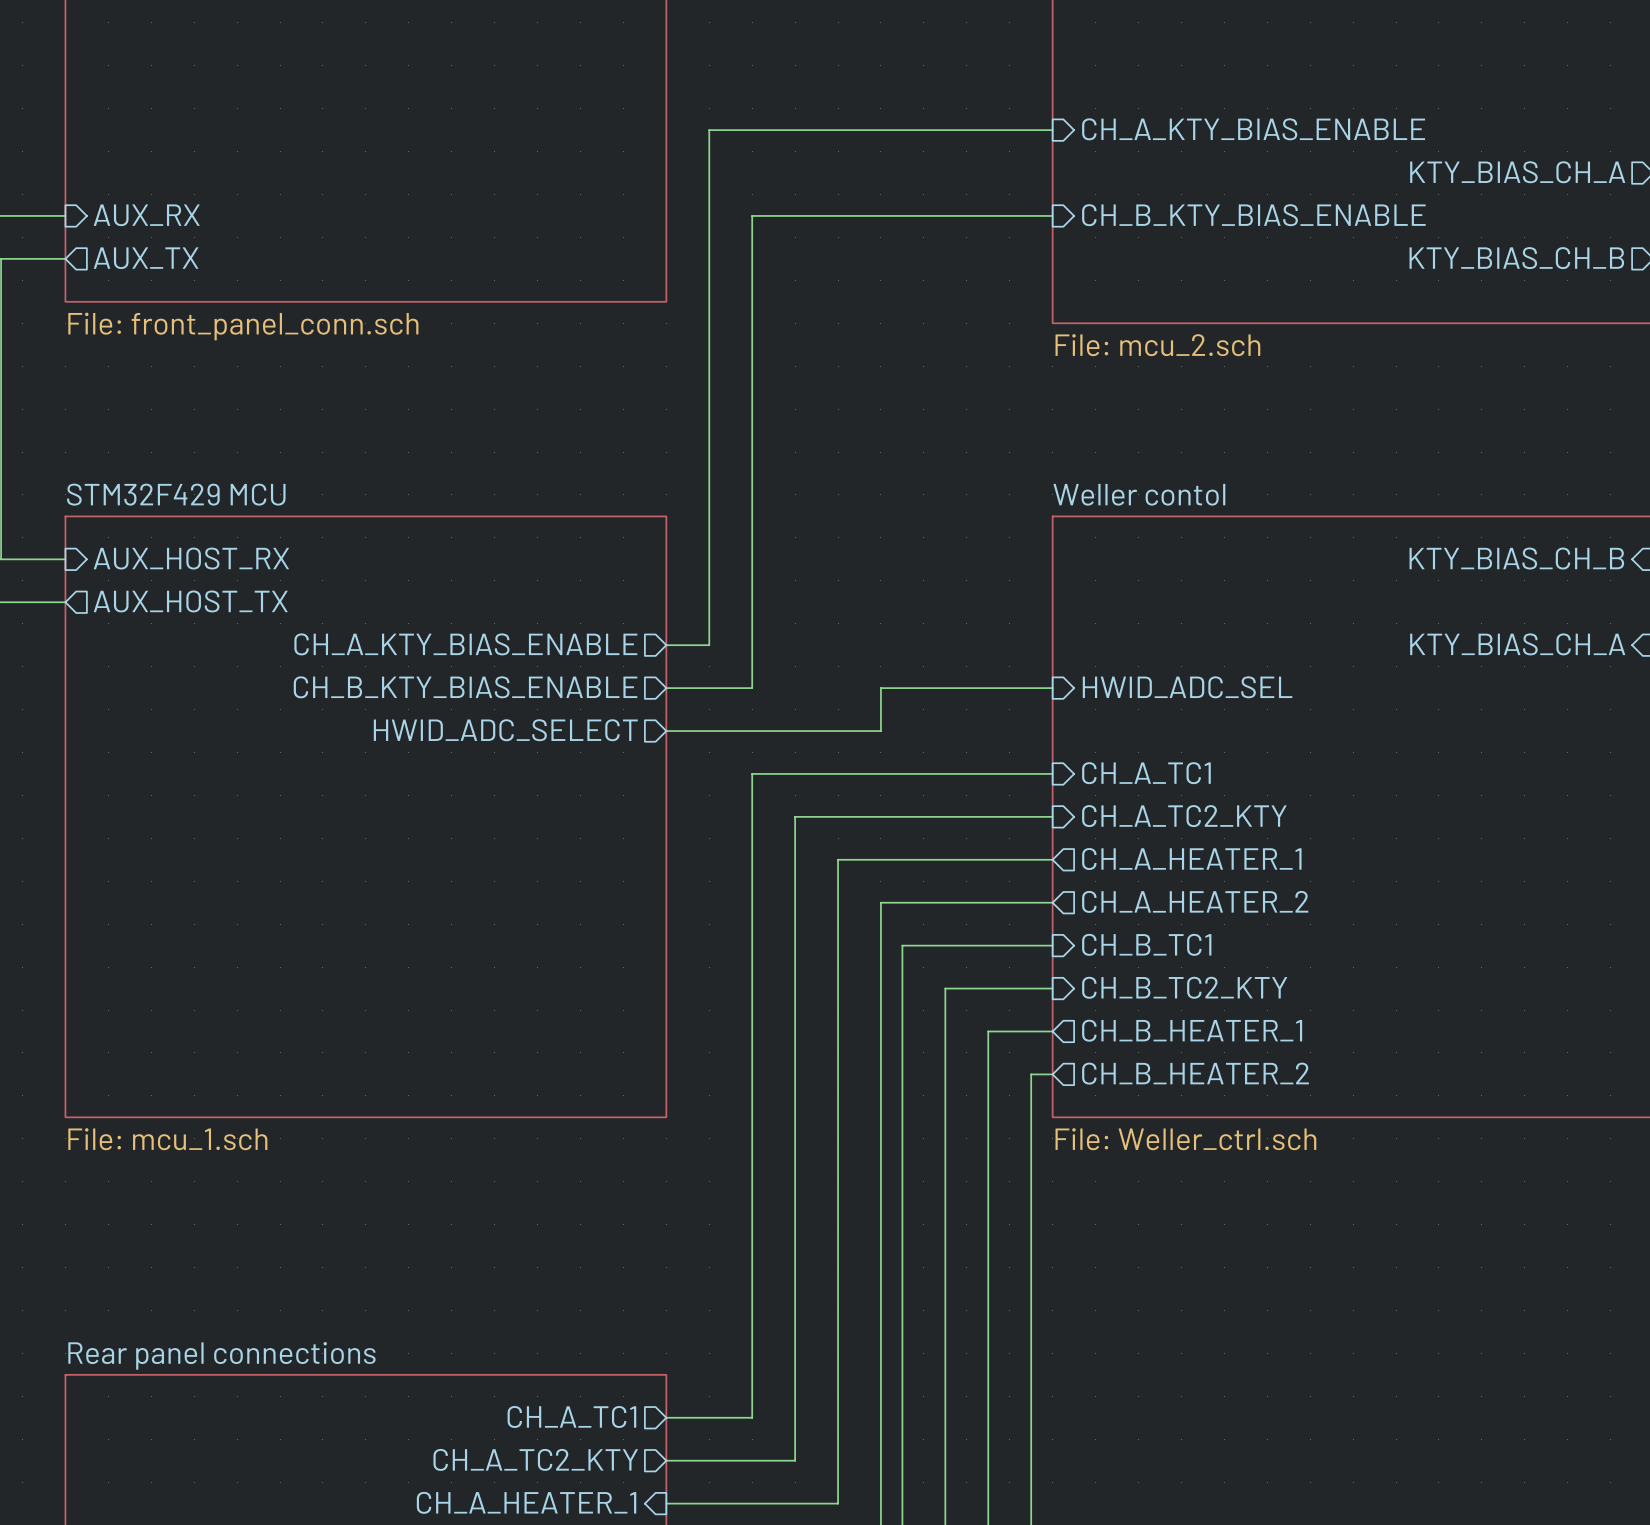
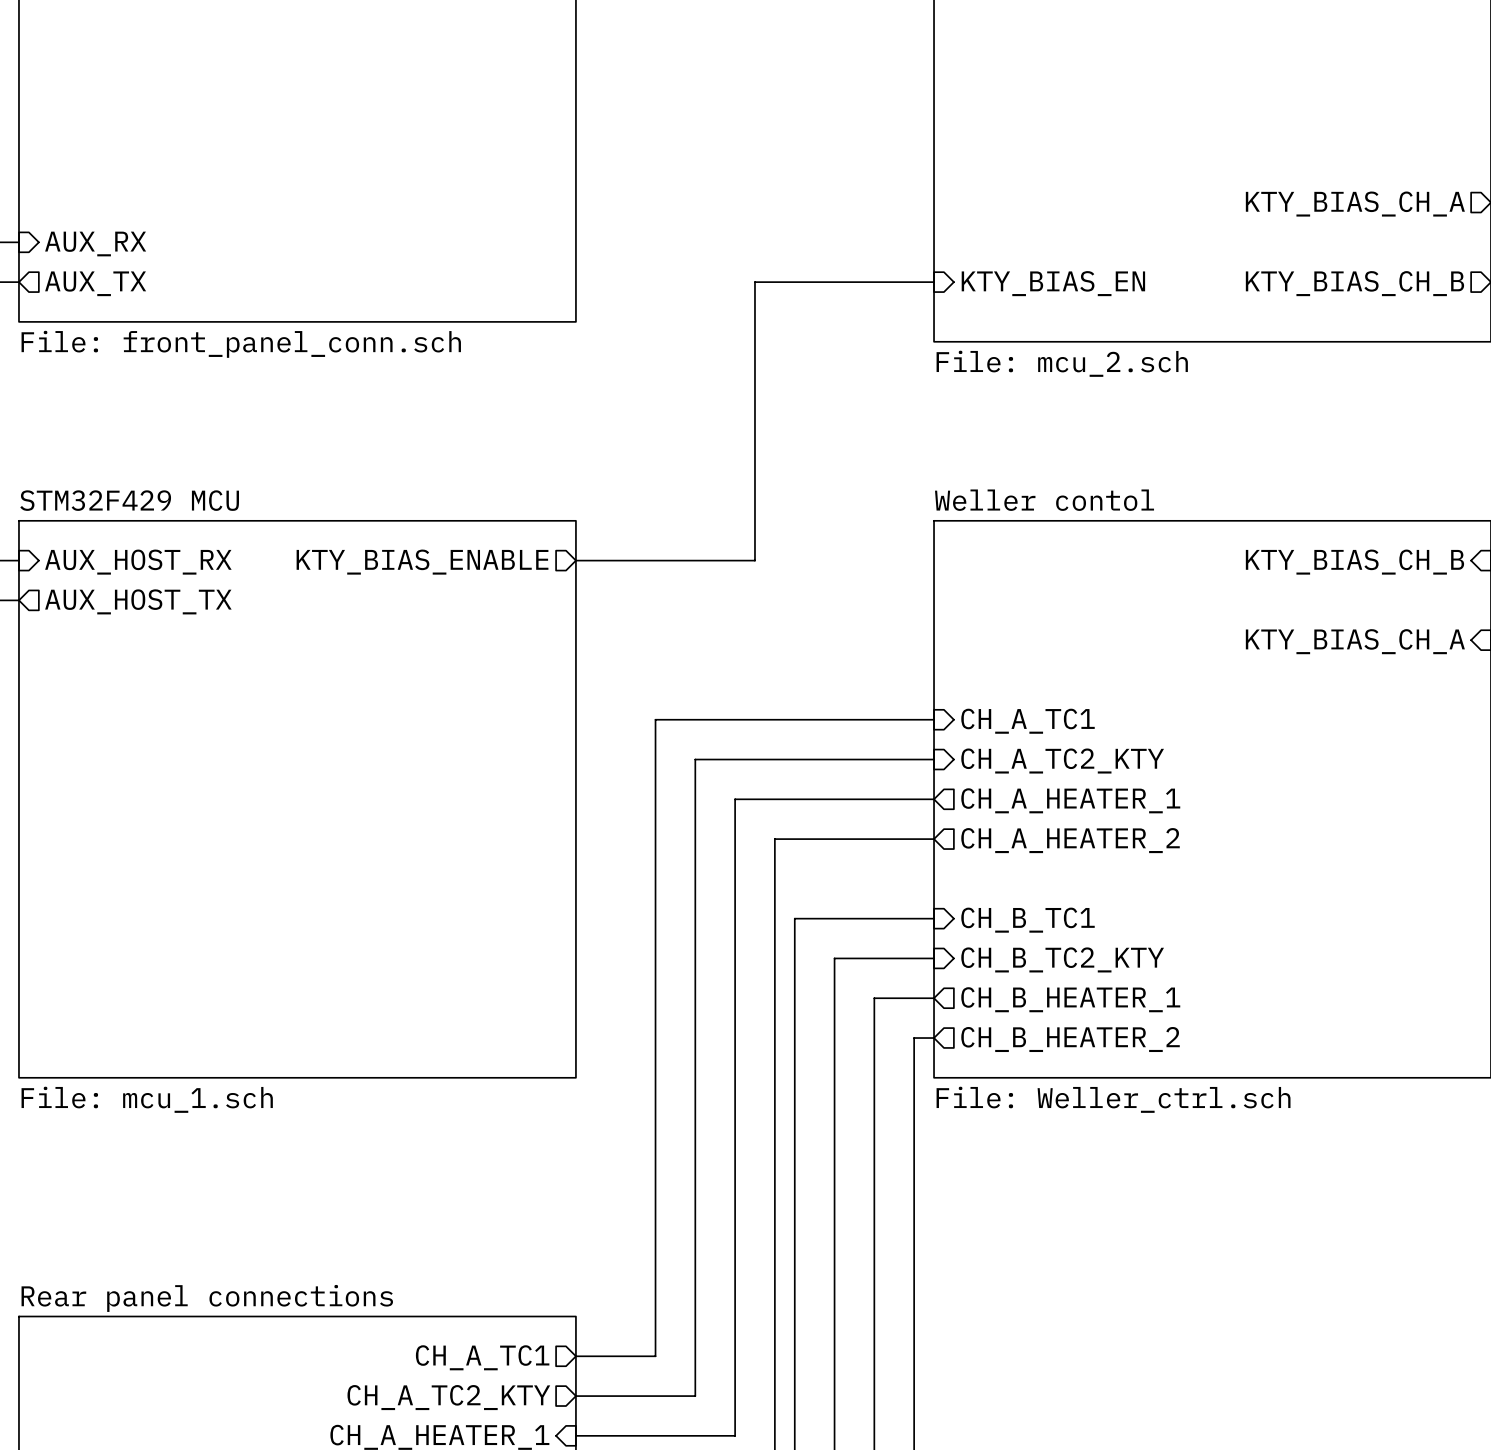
sheet pin: CH_A_KTY_BIAS_ENABLE (1253, 129) -> none
wire: (1052, 130) (709, 130) (709, 645) (666, 645) -> none
wire: (1052, 215) (752, 215) (752, 688) (666, 688) -> none
sheet pin: CH_B_KTY_BIAS_ENABLE (1253, 215) -> KTY_BIAS_EN (1053, 283)
wire: none -> (934, 282) (754, 282) (754, 560) (575, 560)
sheet pin: none -> KTY_BIAS_ENABLE (422, 562)
sheet pin: CH_A_KTY_BIAS_ENABLE (465, 644) -> none
sheet pin: CH_B_KTY_BIAS_ENABLE (465, 687) -> none
sheet pin: HWID_ADC_SEL (1187, 687) -> none
wire: (1052, 688) (880, 688) (880, 731) -> (934, 719) (774, 719)
sheet pin: HWID_ADC_SELECT (505, 730) -> none
sheet pin: none -> CH_A_TC1 (1028, 721)
wire: (666, 731) (752, 731) -> none
wire: (752, 773) (795, 773) -> (655, 759) (655, 719)
sheet pin: CH_A_TC1 (1146, 773) -> CH_A_TC2_KTY (1062, 761)
wire: (795, 816) (838, 816) -> (695, 799) (695, 759)
sheet pin shape: input (1184, 816) -> output (1070, 800)
sheet pin: CH_A_TC2_KTY (1184, 816) -> CH_A_HEATER_1 (1070, 800)
wire: (838, 859) (880, 859) -> (735, 839) (735, 799)
sheet pin: CH_A_HEATER_1 (1191, 859) -> CH_A_HEATER_2 (1070, 840)
sheet pin: CH_A_HEATER_2 (1195, 901) -> none
wire: (880, 902) (1052, 902) -> (774, 878) (774, 839)

